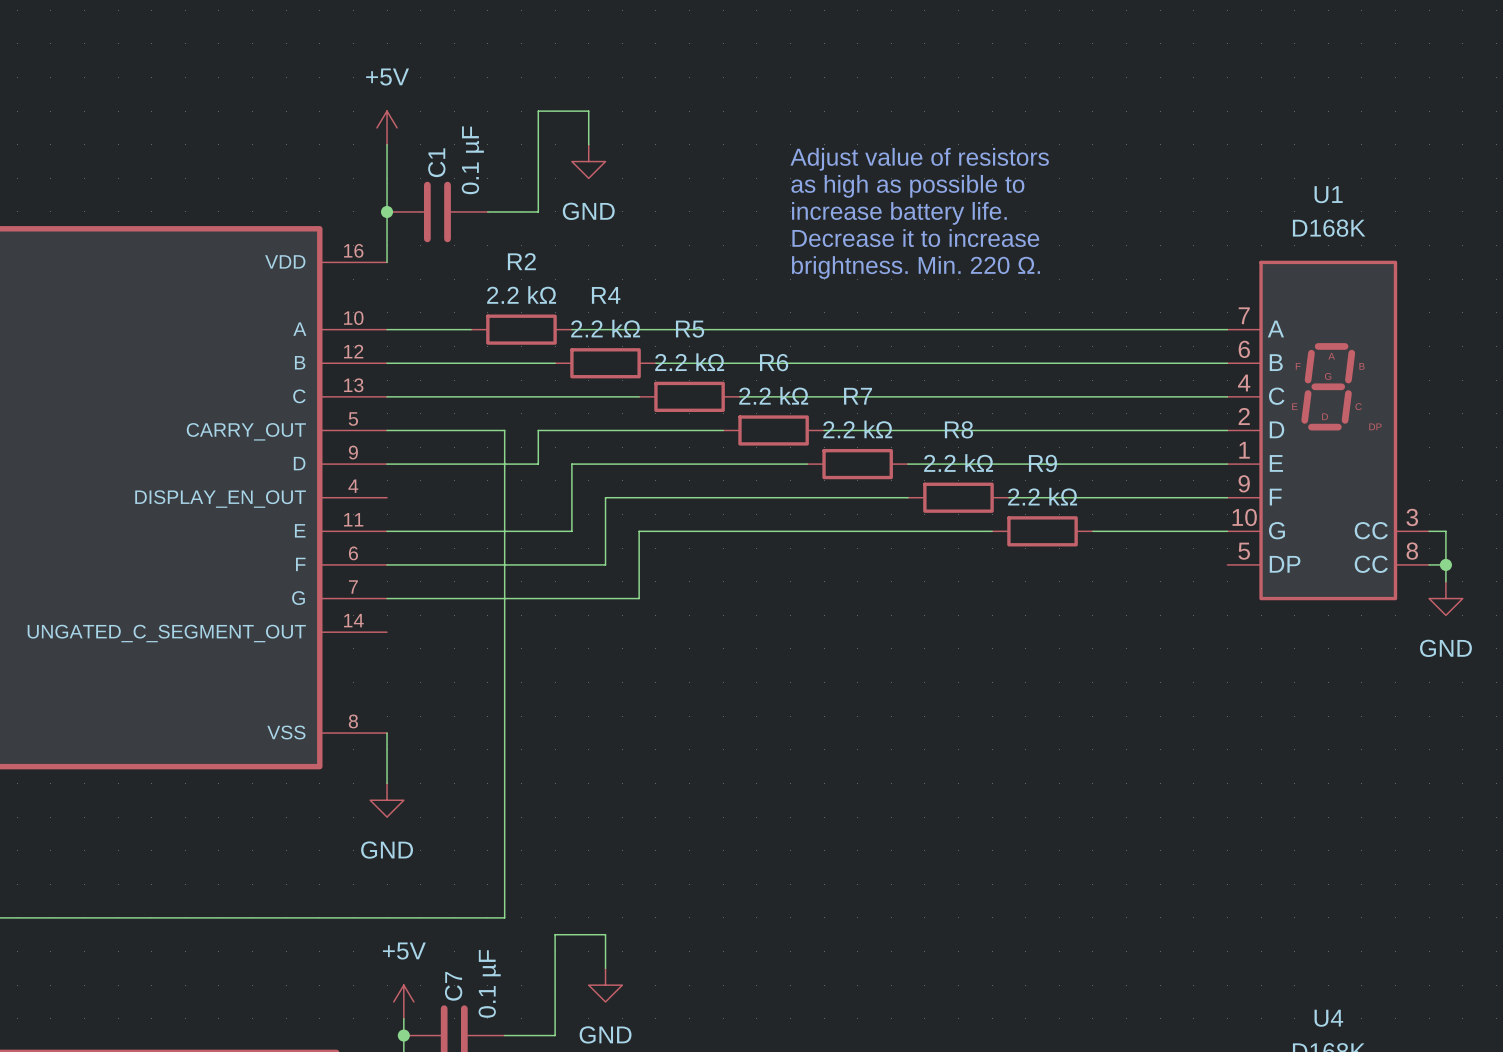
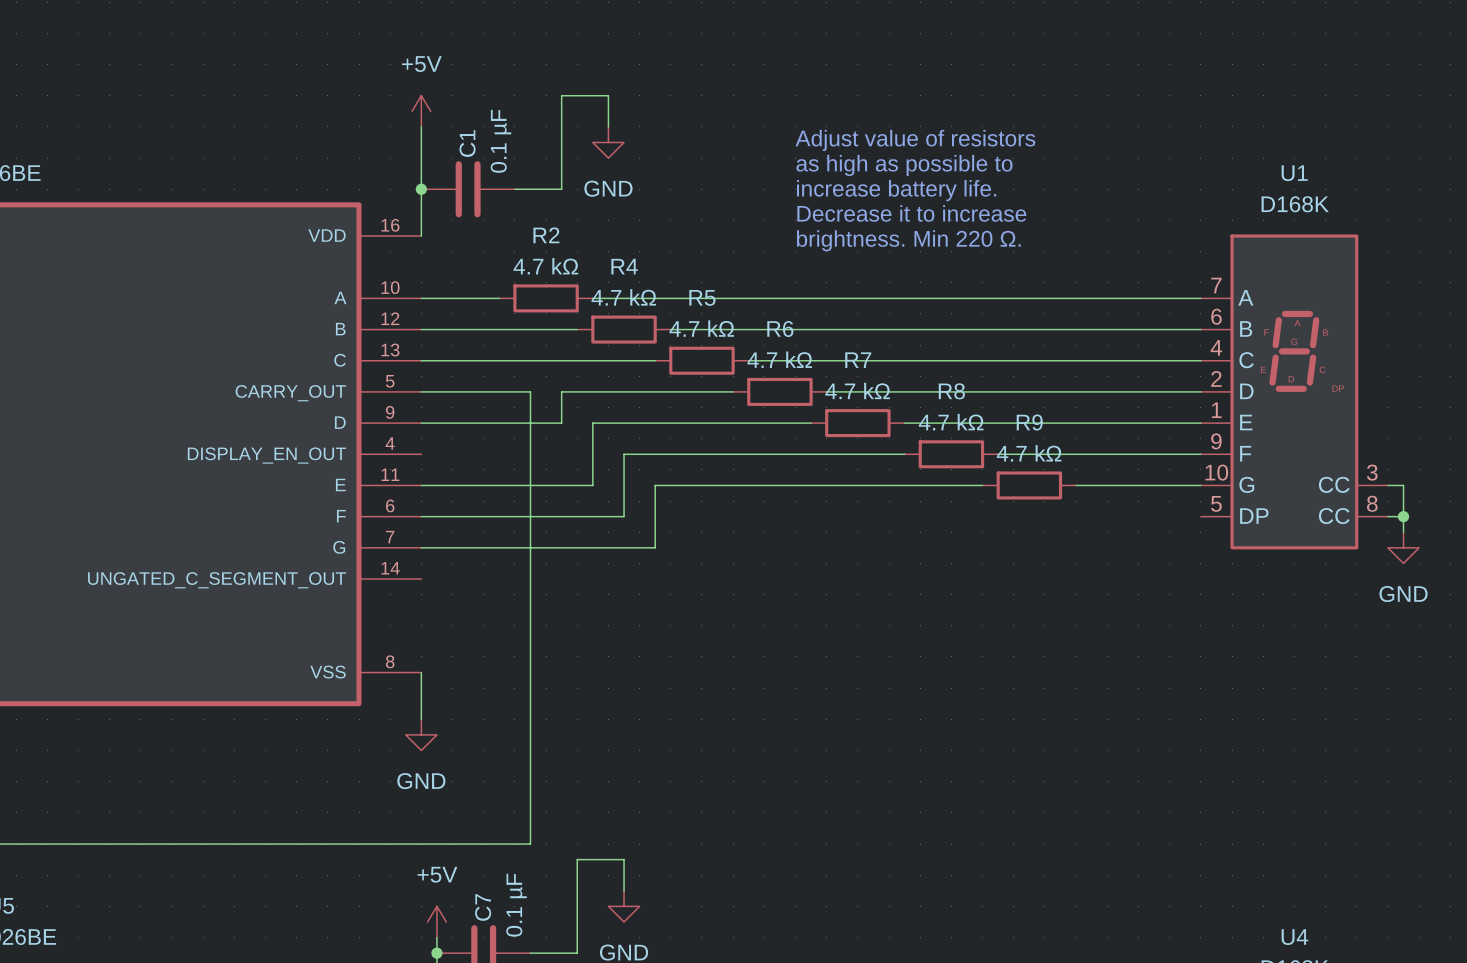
text: brightness. Min. 220 Ω. (916, 267) -> brightness. Min 220 Ω. (908, 240)
R2 value: 2.2 kΩ (521, 294) -> 4.7 kΩ (545, 266)
R4 value: 2.2 kΩ (605, 328) -> 4.7 kΩ (623, 297)
R5 value: 2.2 kΩ (689, 362) -> 4.7 kΩ (701, 328)
R6 value: 2.2 kΩ (773, 395) -> 4.7 kΩ (779, 359)
R7 value: 2.2 kΩ (857, 429) -> 4.7 kΩ (857, 390)
R8 value: 2.2 kΩ (958, 463) -> 4.7 kΩ (951, 422)
R9 value: 2.2 kΩ (1042, 496) -> 4.7 kΩ (1029, 453)

